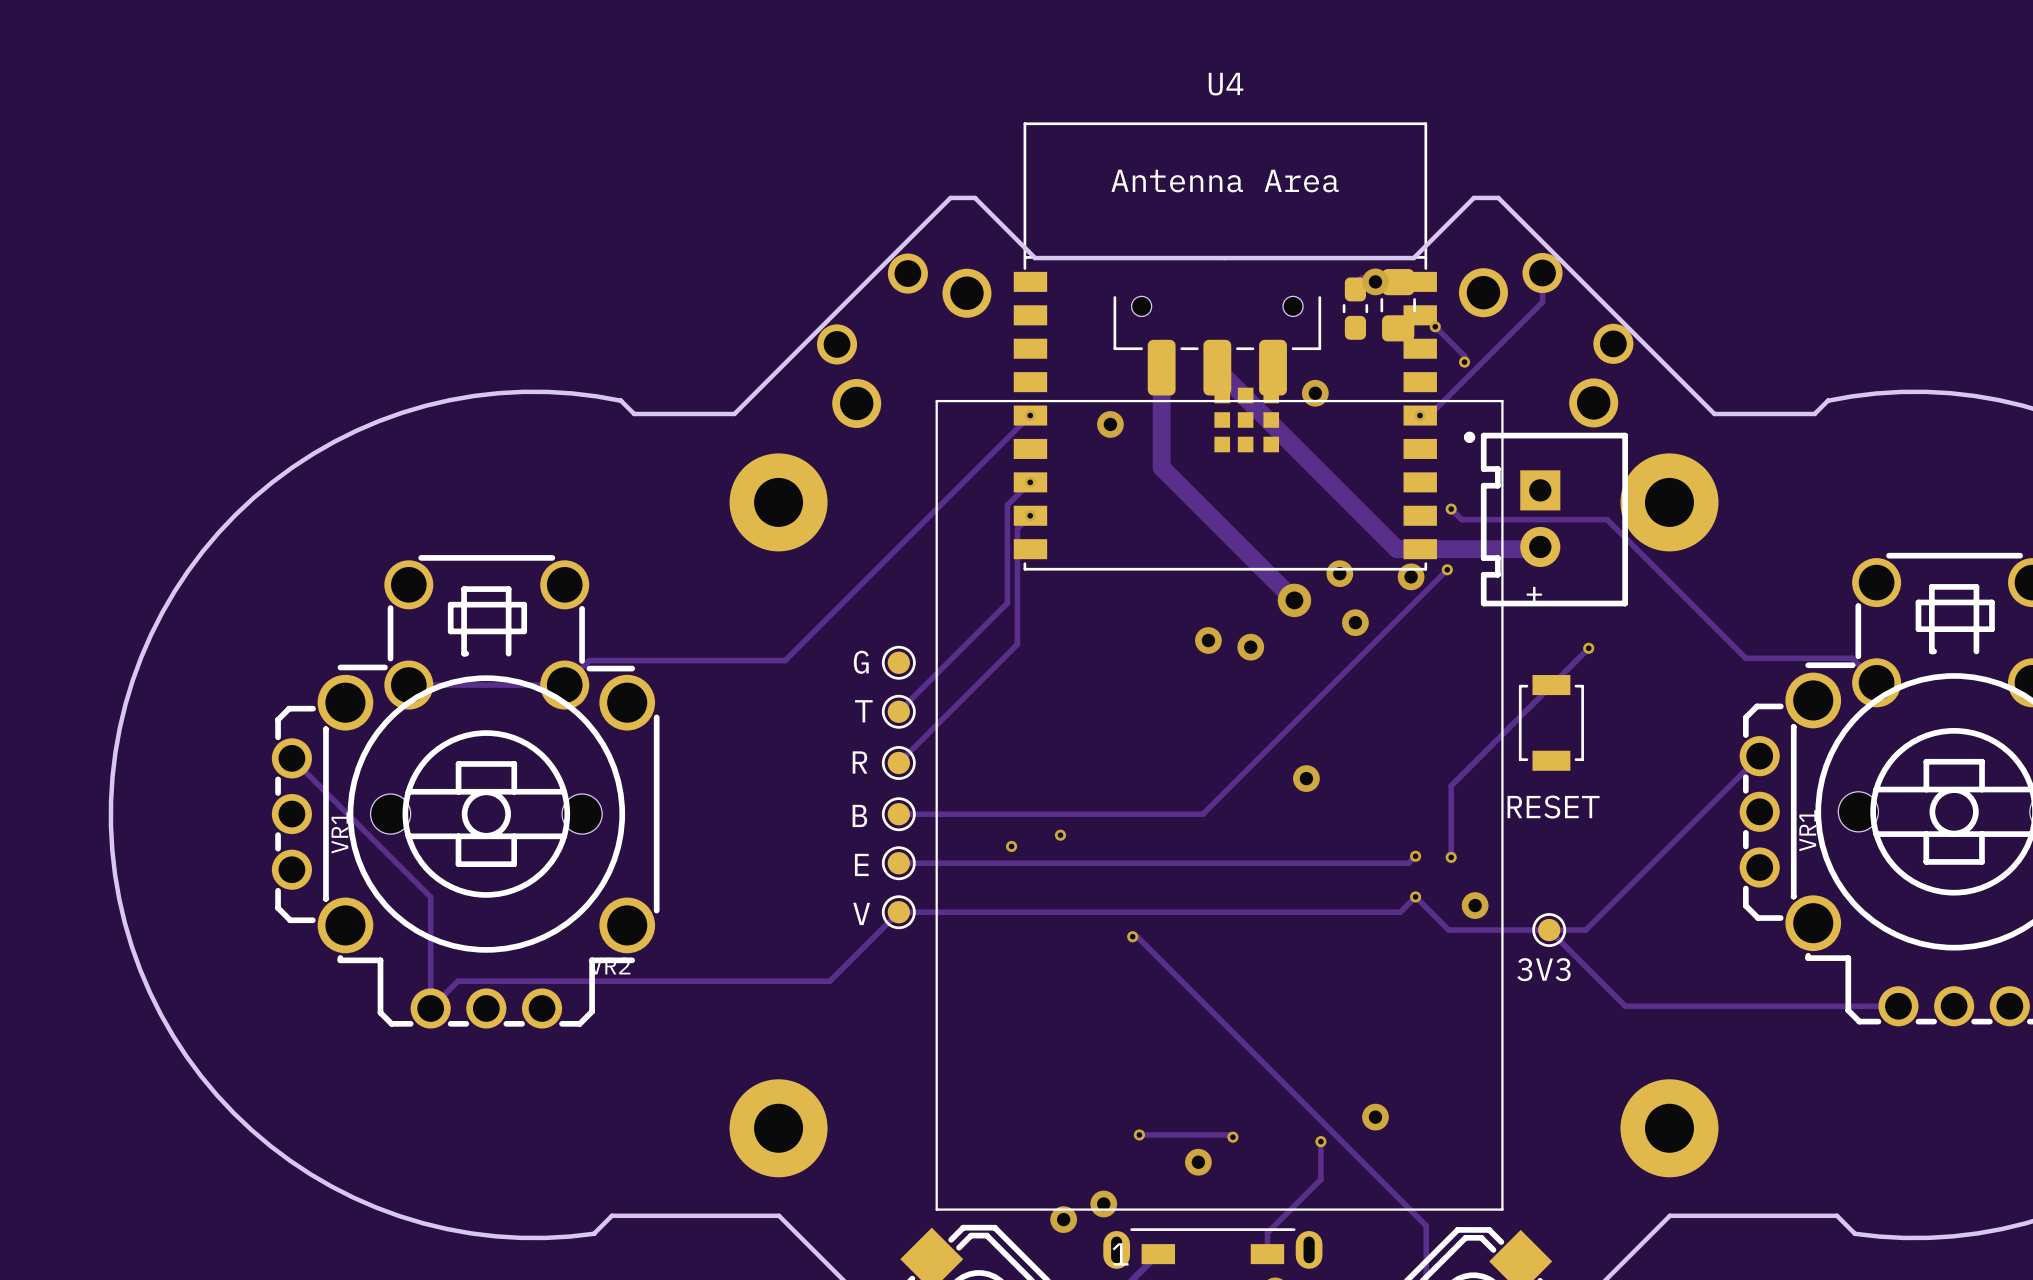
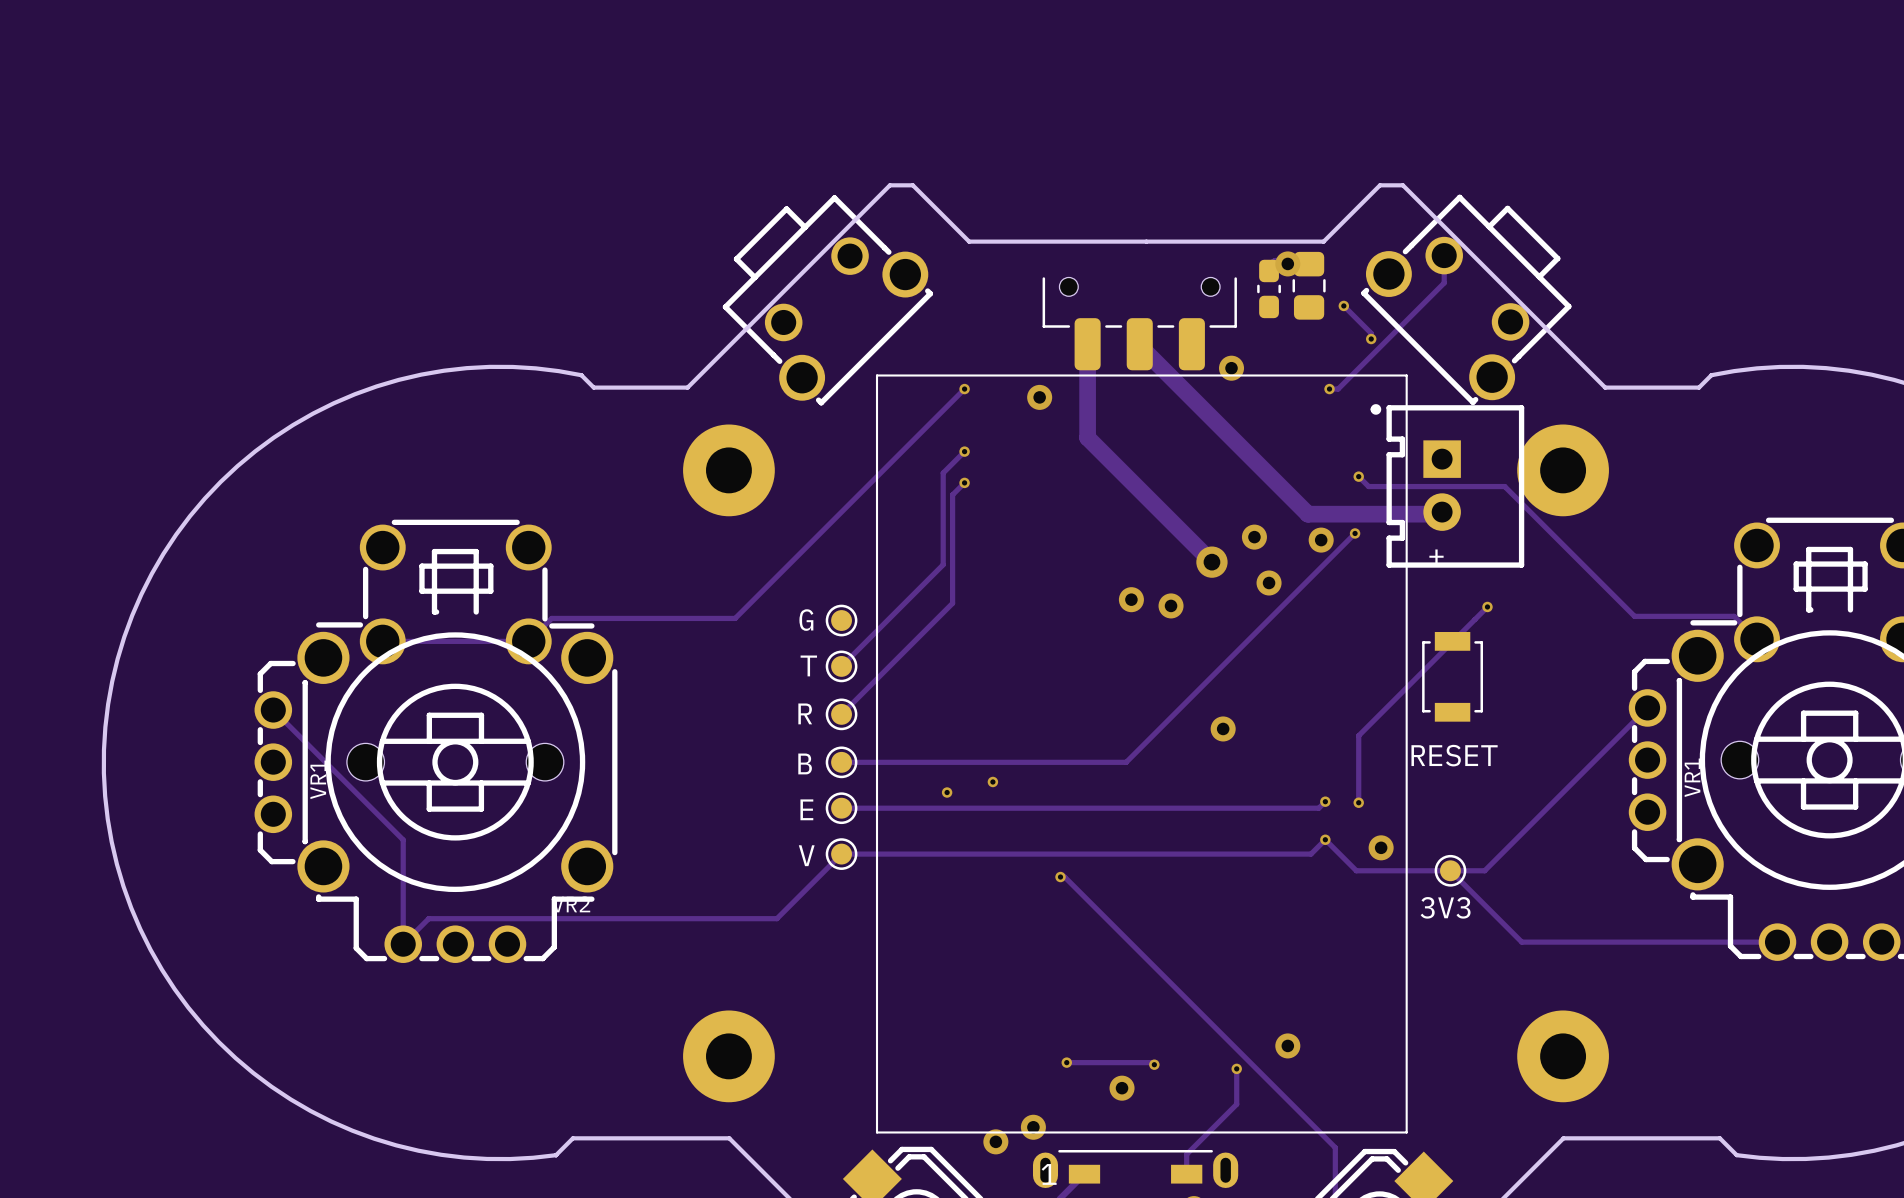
part side: bottom (904, 340) -> top (827, 300)
part side: bottom (1546, 340) -> top (1466, 299)
U4: (1225, 346) -> none

